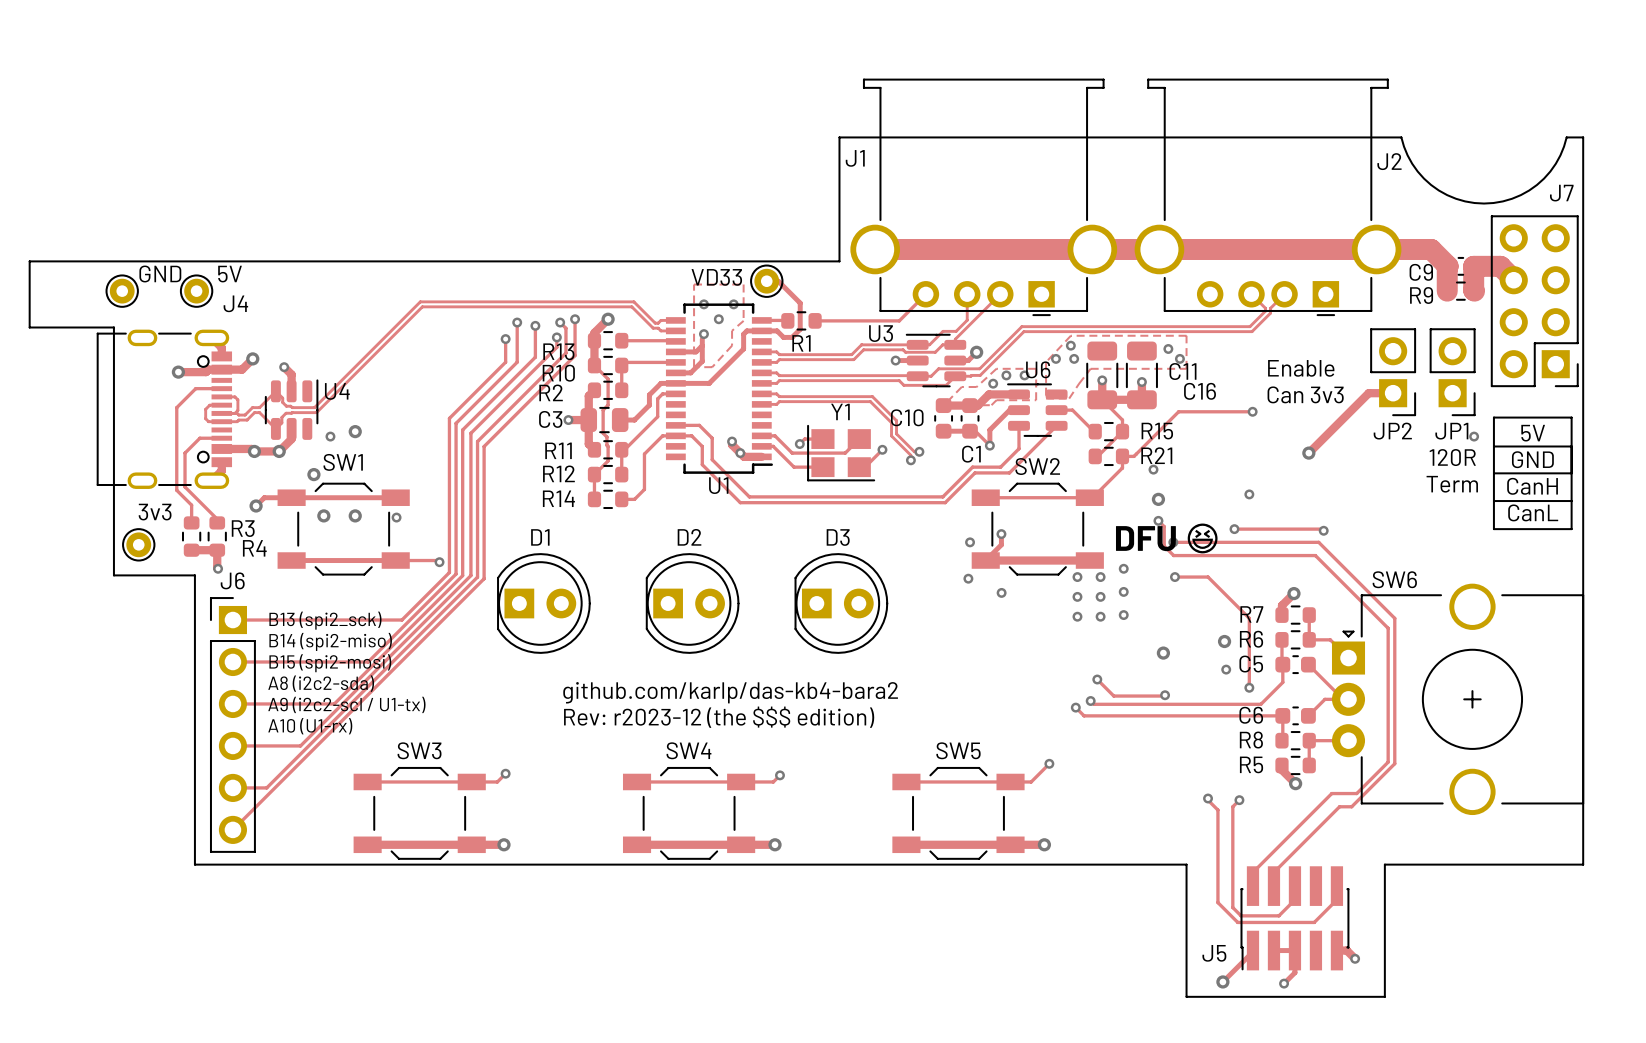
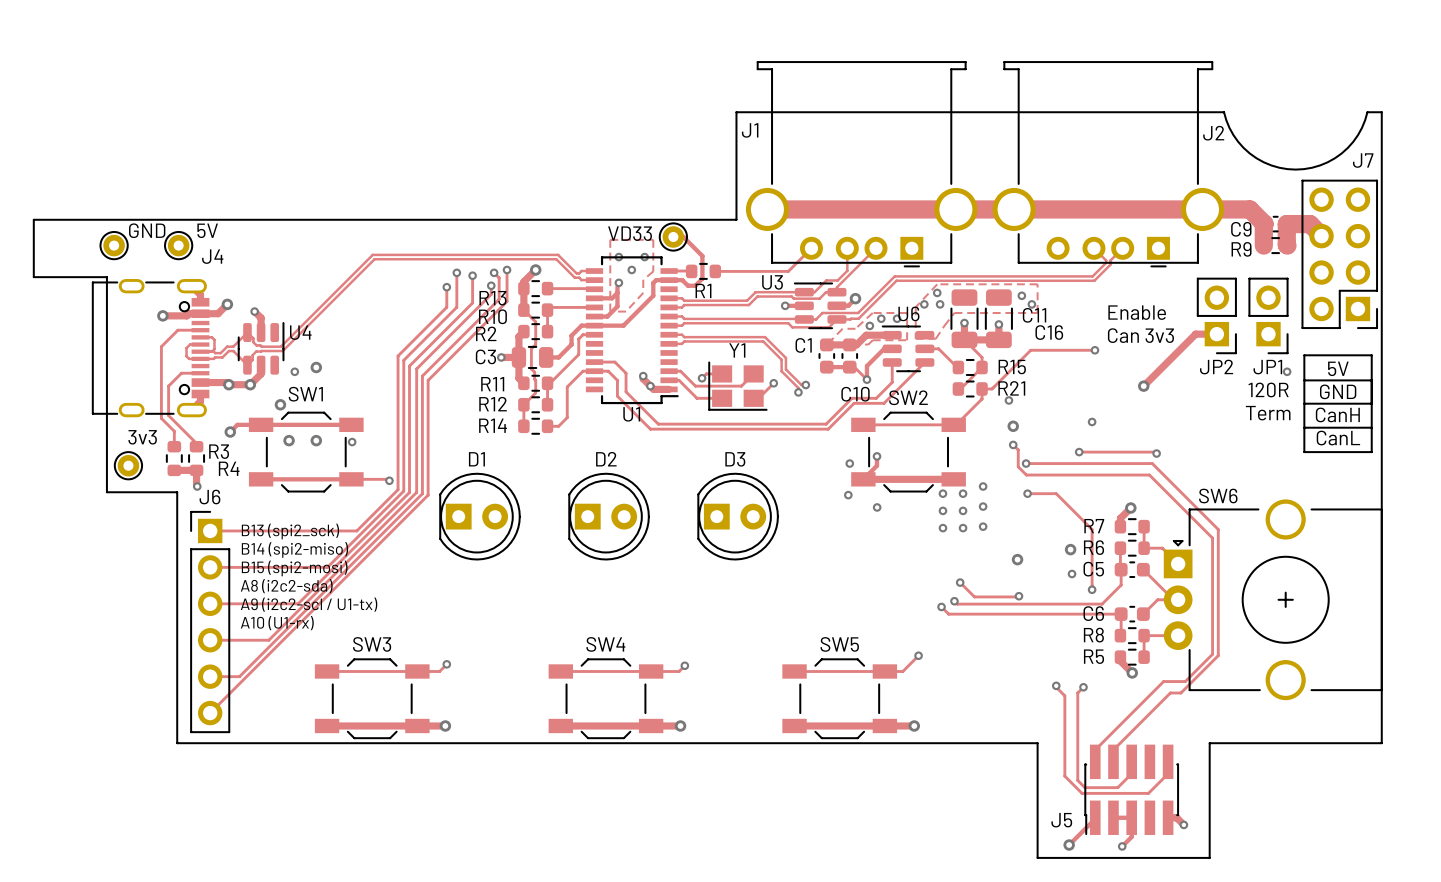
C10 name position: C10 (907, 417) -> C10 (855, 394)
C1 name position: C1 (971, 454) -> C1 (803, 345)
text: DFU 😆 (1166, 538) -> none
text: github.com/karlp/das-kb4-bara2 (730, 692) -> none
text: Rev: r2023-12 (the $$$ edition) (719, 717) -> none

